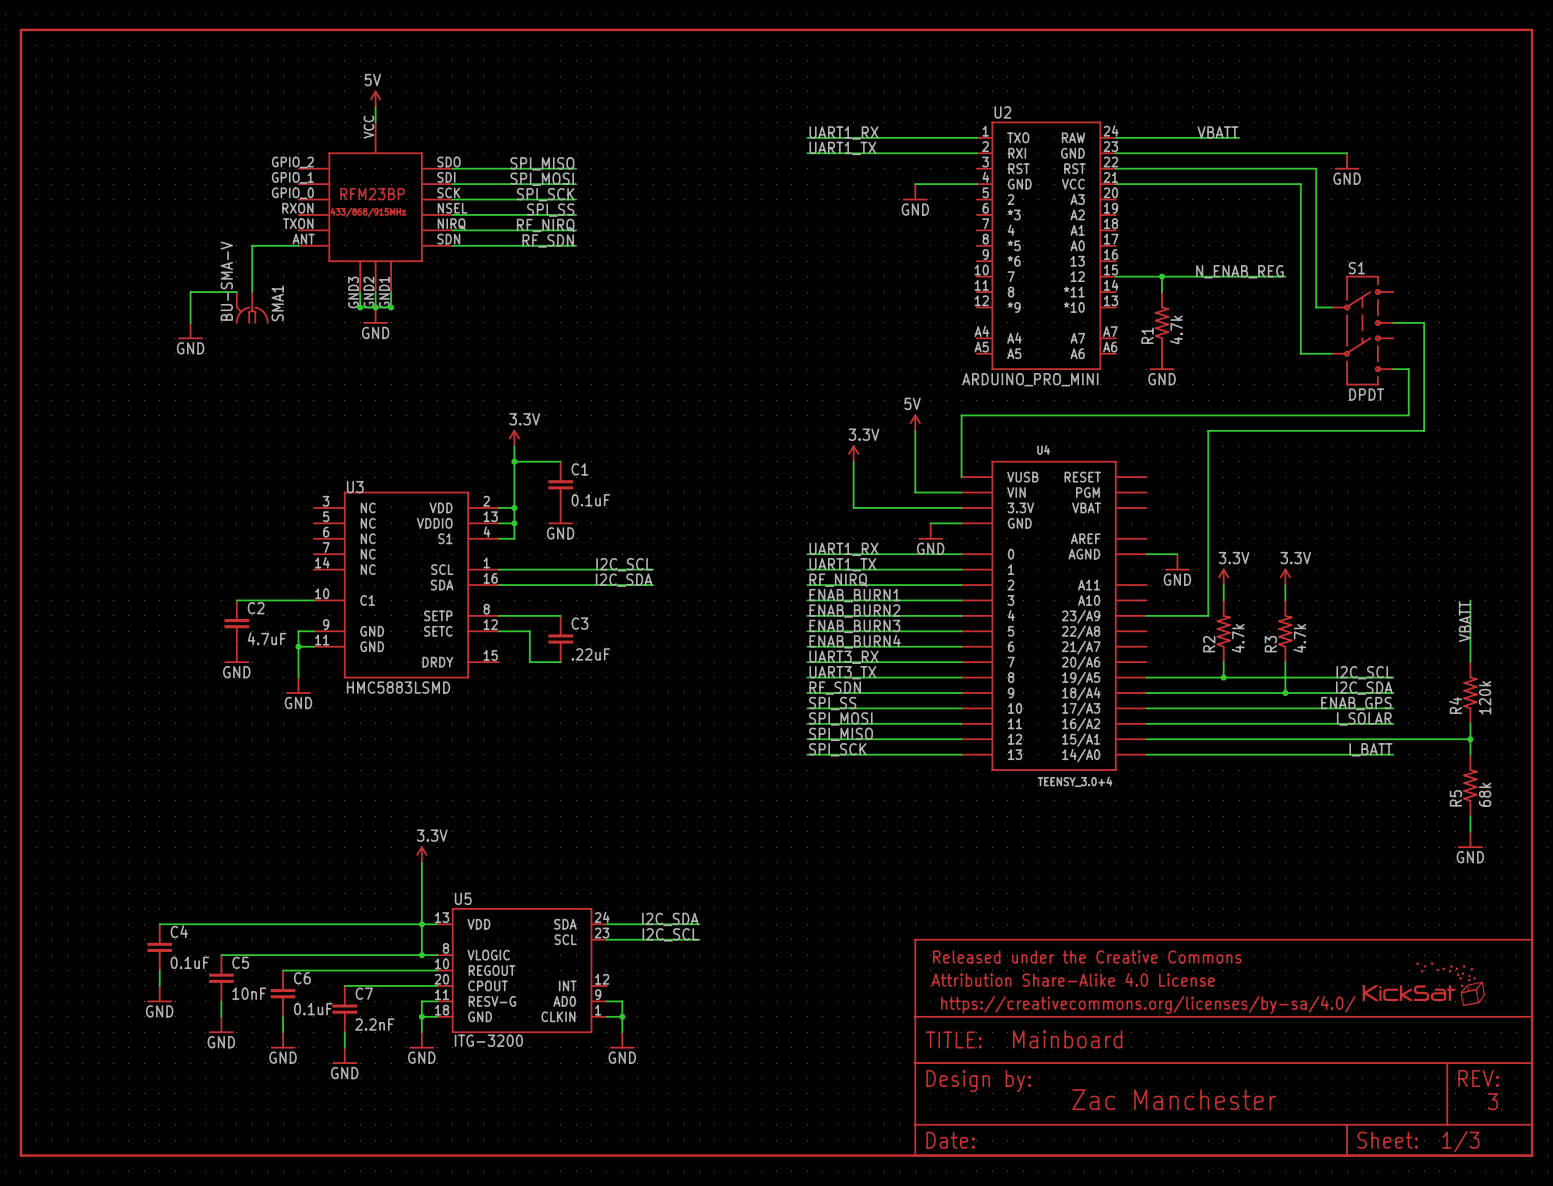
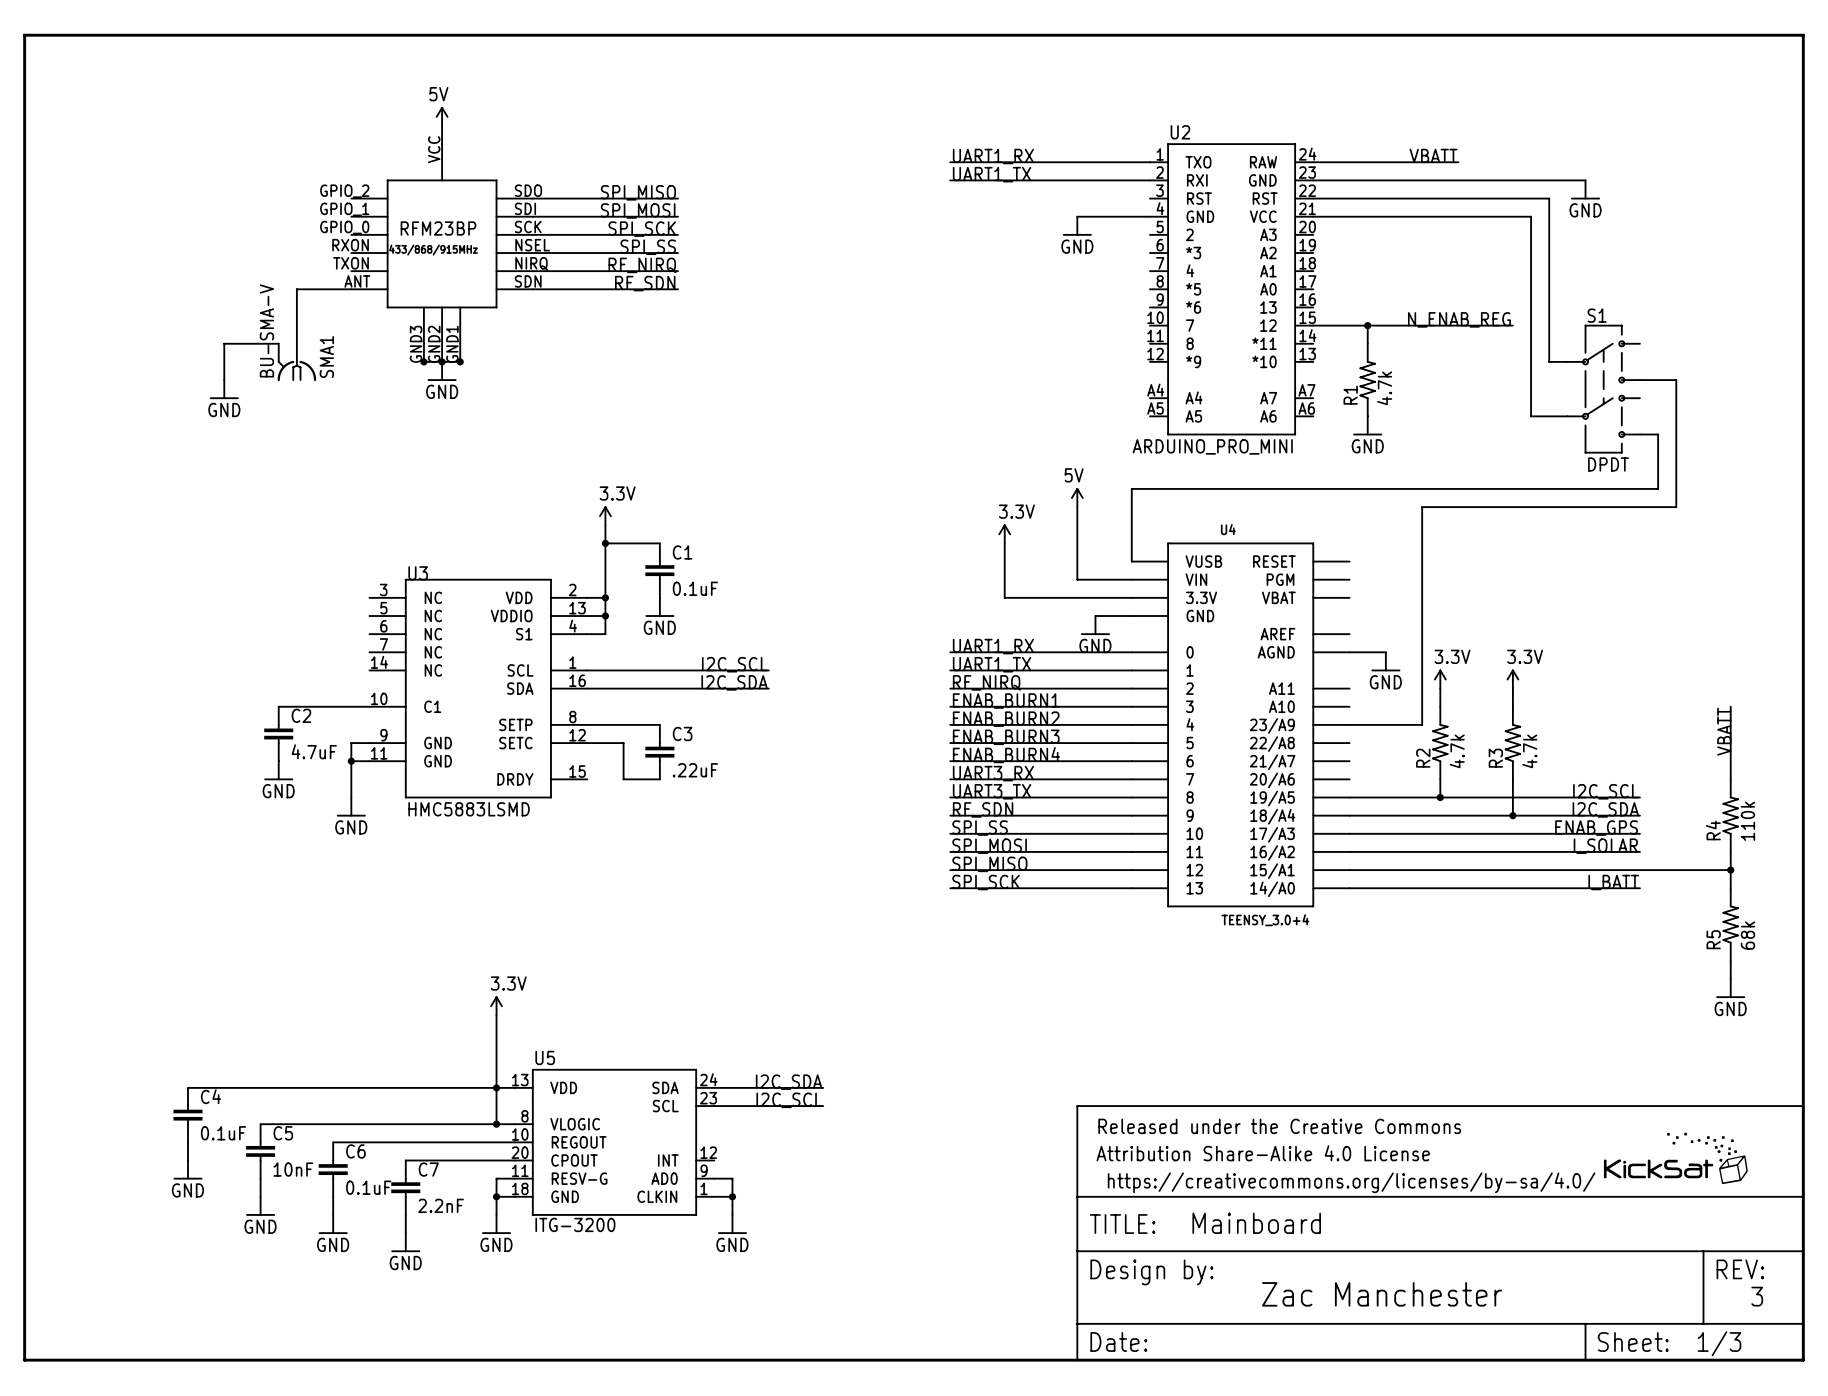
R4 value: 120k (1485, 697) -> 110k (1747, 821)

